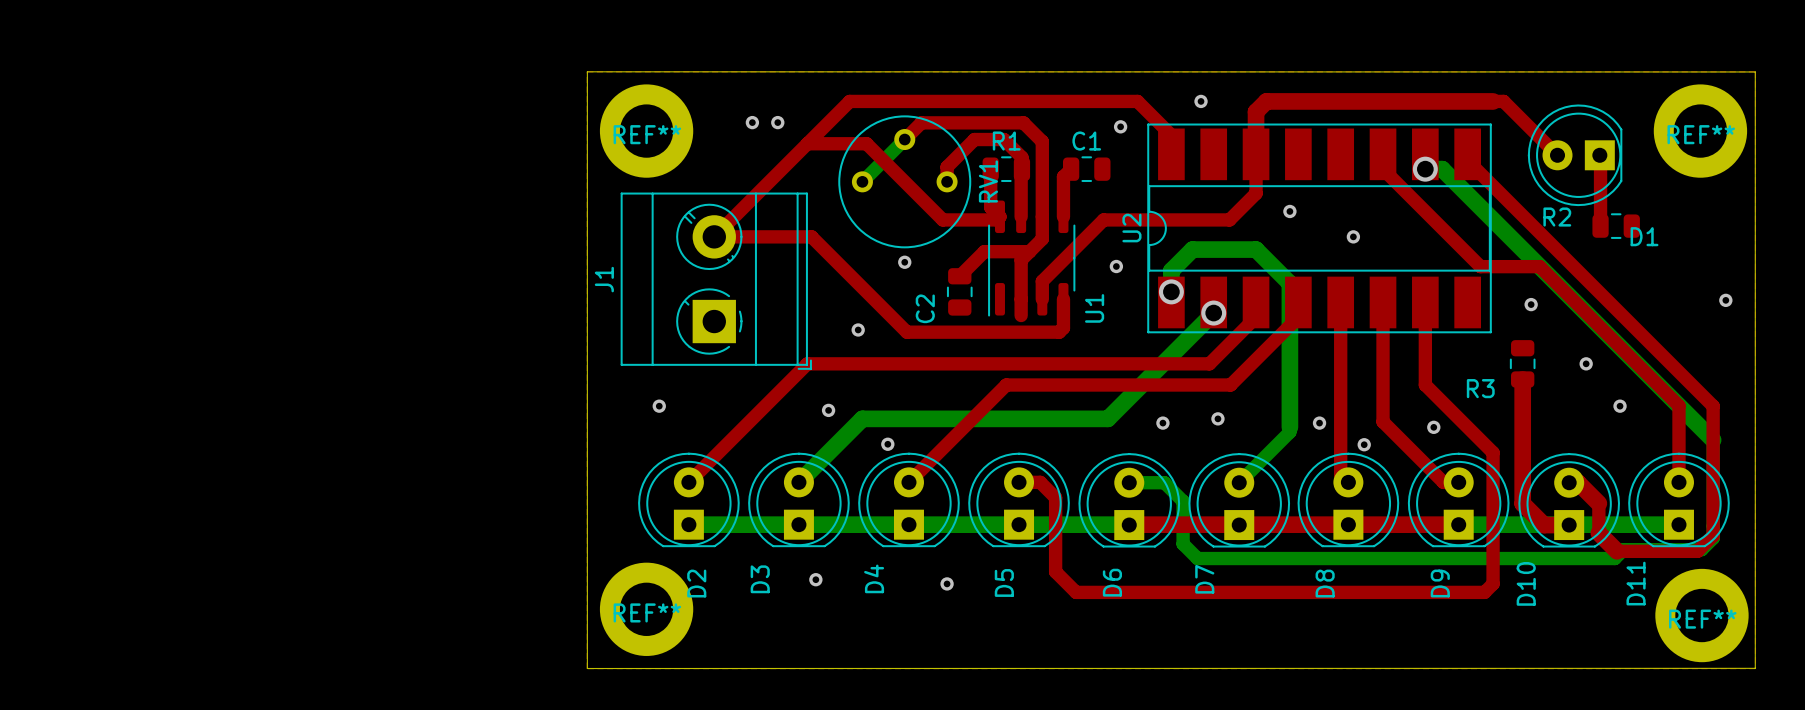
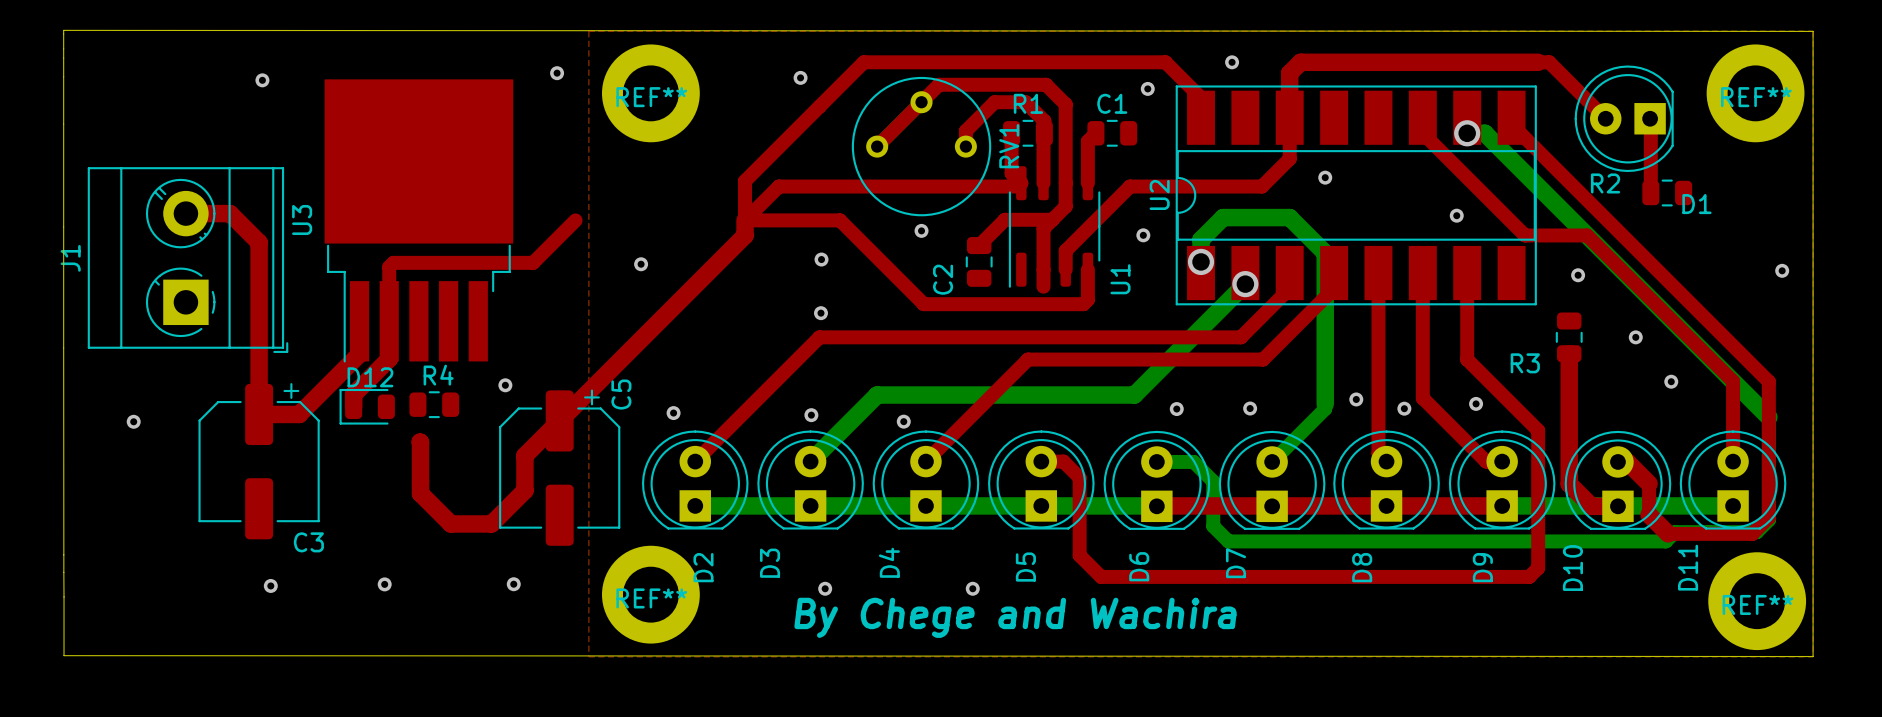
board edge: (1755, 71) (587, 71) (587, 668) (1755, 668) -> (1813, 31) (63, 30) (64, 655) (1813, 656)
via: none -> (557, 73)
via: none -> (262, 80)
via: (752, 122) -> none
via position: (777, 122) -> (800, 77)
top track: none -> (921, 102) (877, 146)
top track: (807, 143) (866, 143) (942, 219) -> (745, 220) (778, 186) (961, 186)
top track: (736, 214) (714, 236) (811, 236) (827, 252) -> (745, 220) (840, 220)
top track: none -> (745, 181) (745, 220)
via position: (1353, 236) -> (1456, 215)
top track: none -> (185, 213) (230, 213) (259, 242) (259, 414) (299, 414) (359, 354) (359, 321)
U3: none -> (418, 220)
top track: none -> (575, 220) (533, 262) (393, 262) (389, 267) (389, 358) (353, 394) (353, 406)
top track: none -> (745, 220) (745, 235) (524, 455) (524, 490) (491, 523) (450, 523) (420, 493) (420, 441)
J1 position: (716, 281) -> (188, 260)
via: none -> (821, 259)
via: none -> (641, 264)
via: (858, 329) -> none
via: none -> (820, 313)
via position: (659, 406) -> (673, 413)
via: none -> (505, 385)
via: (828, 410) -> none
via position: (1217, 418) -> (1250, 408)
via position: (1162, 423) -> (1176, 409)
R4: none -> (434, 404)
D12: none -> (367, 406)
via: none -> (811, 415)
via: none -> (133, 421)
via position: (1364, 444) -> (1404, 408)
C3: none -> (259, 461)
C5: none -> (559, 467)
via position: (815, 579) -> (825, 588)
via position: (947, 583) -> (972, 588)
via: none -> (384, 584)
via: none -> (513, 584)
via: none -> (270, 585)
text: none -> By Chege and Wachira (1015, 617)

